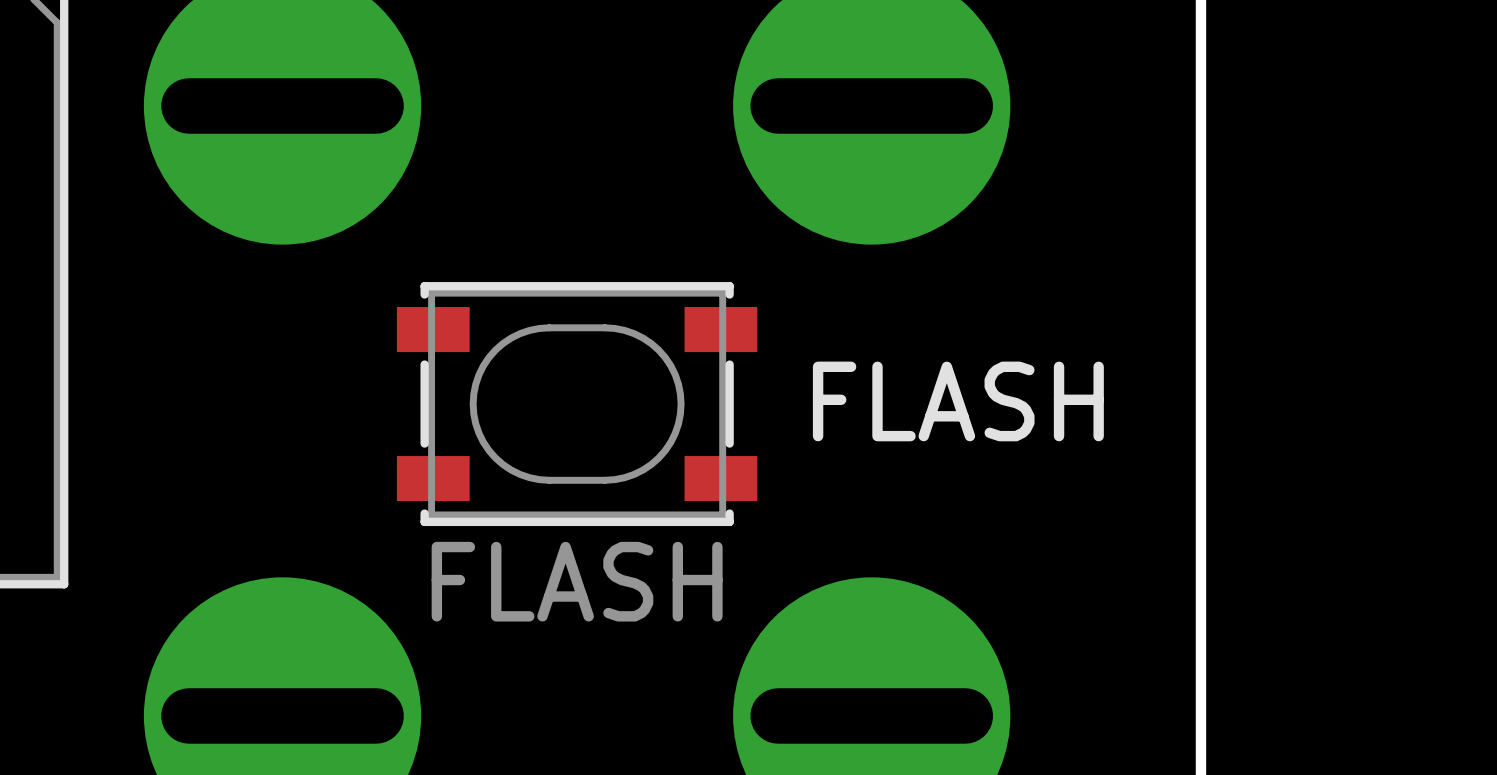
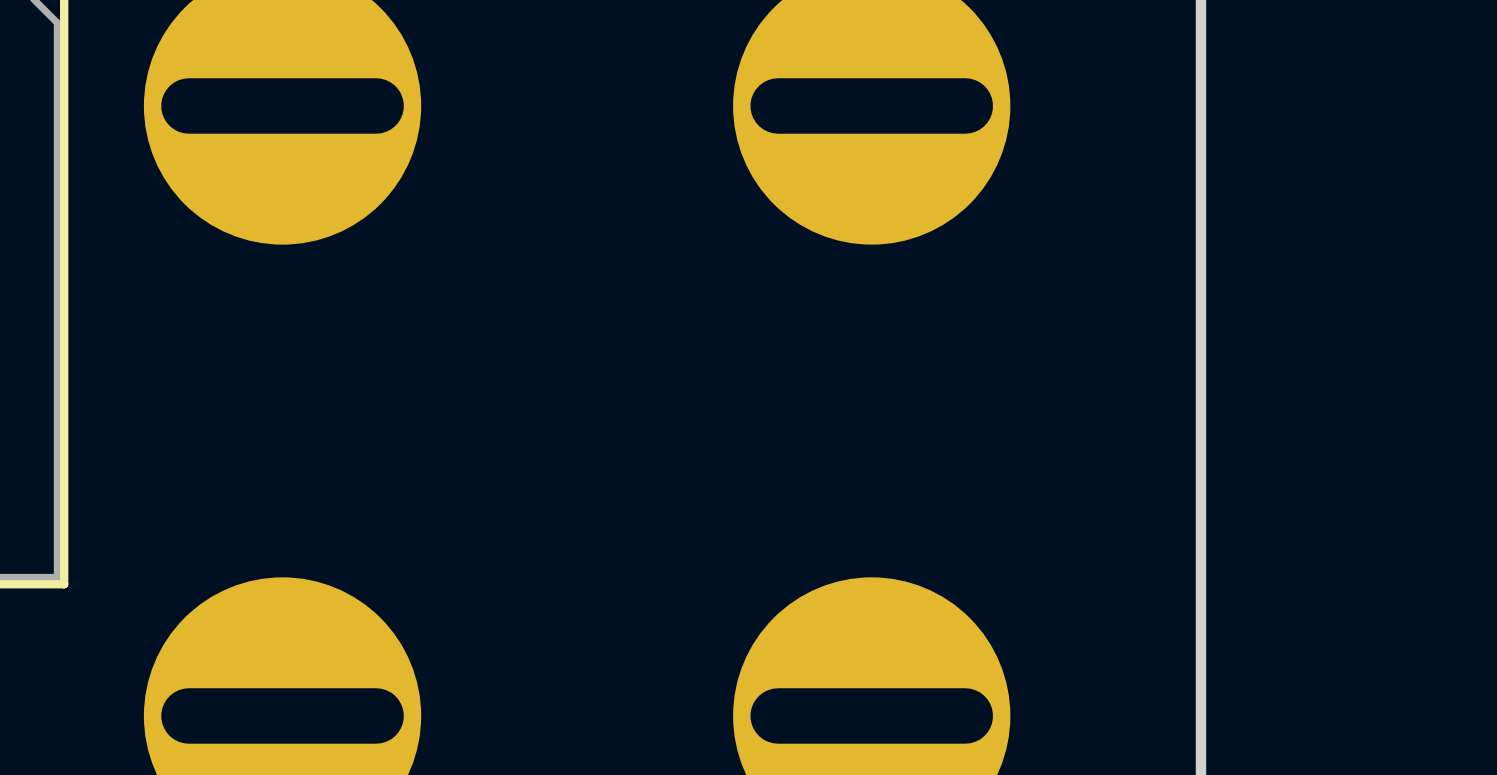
FLASH: FLASH (577, 404) -> none

